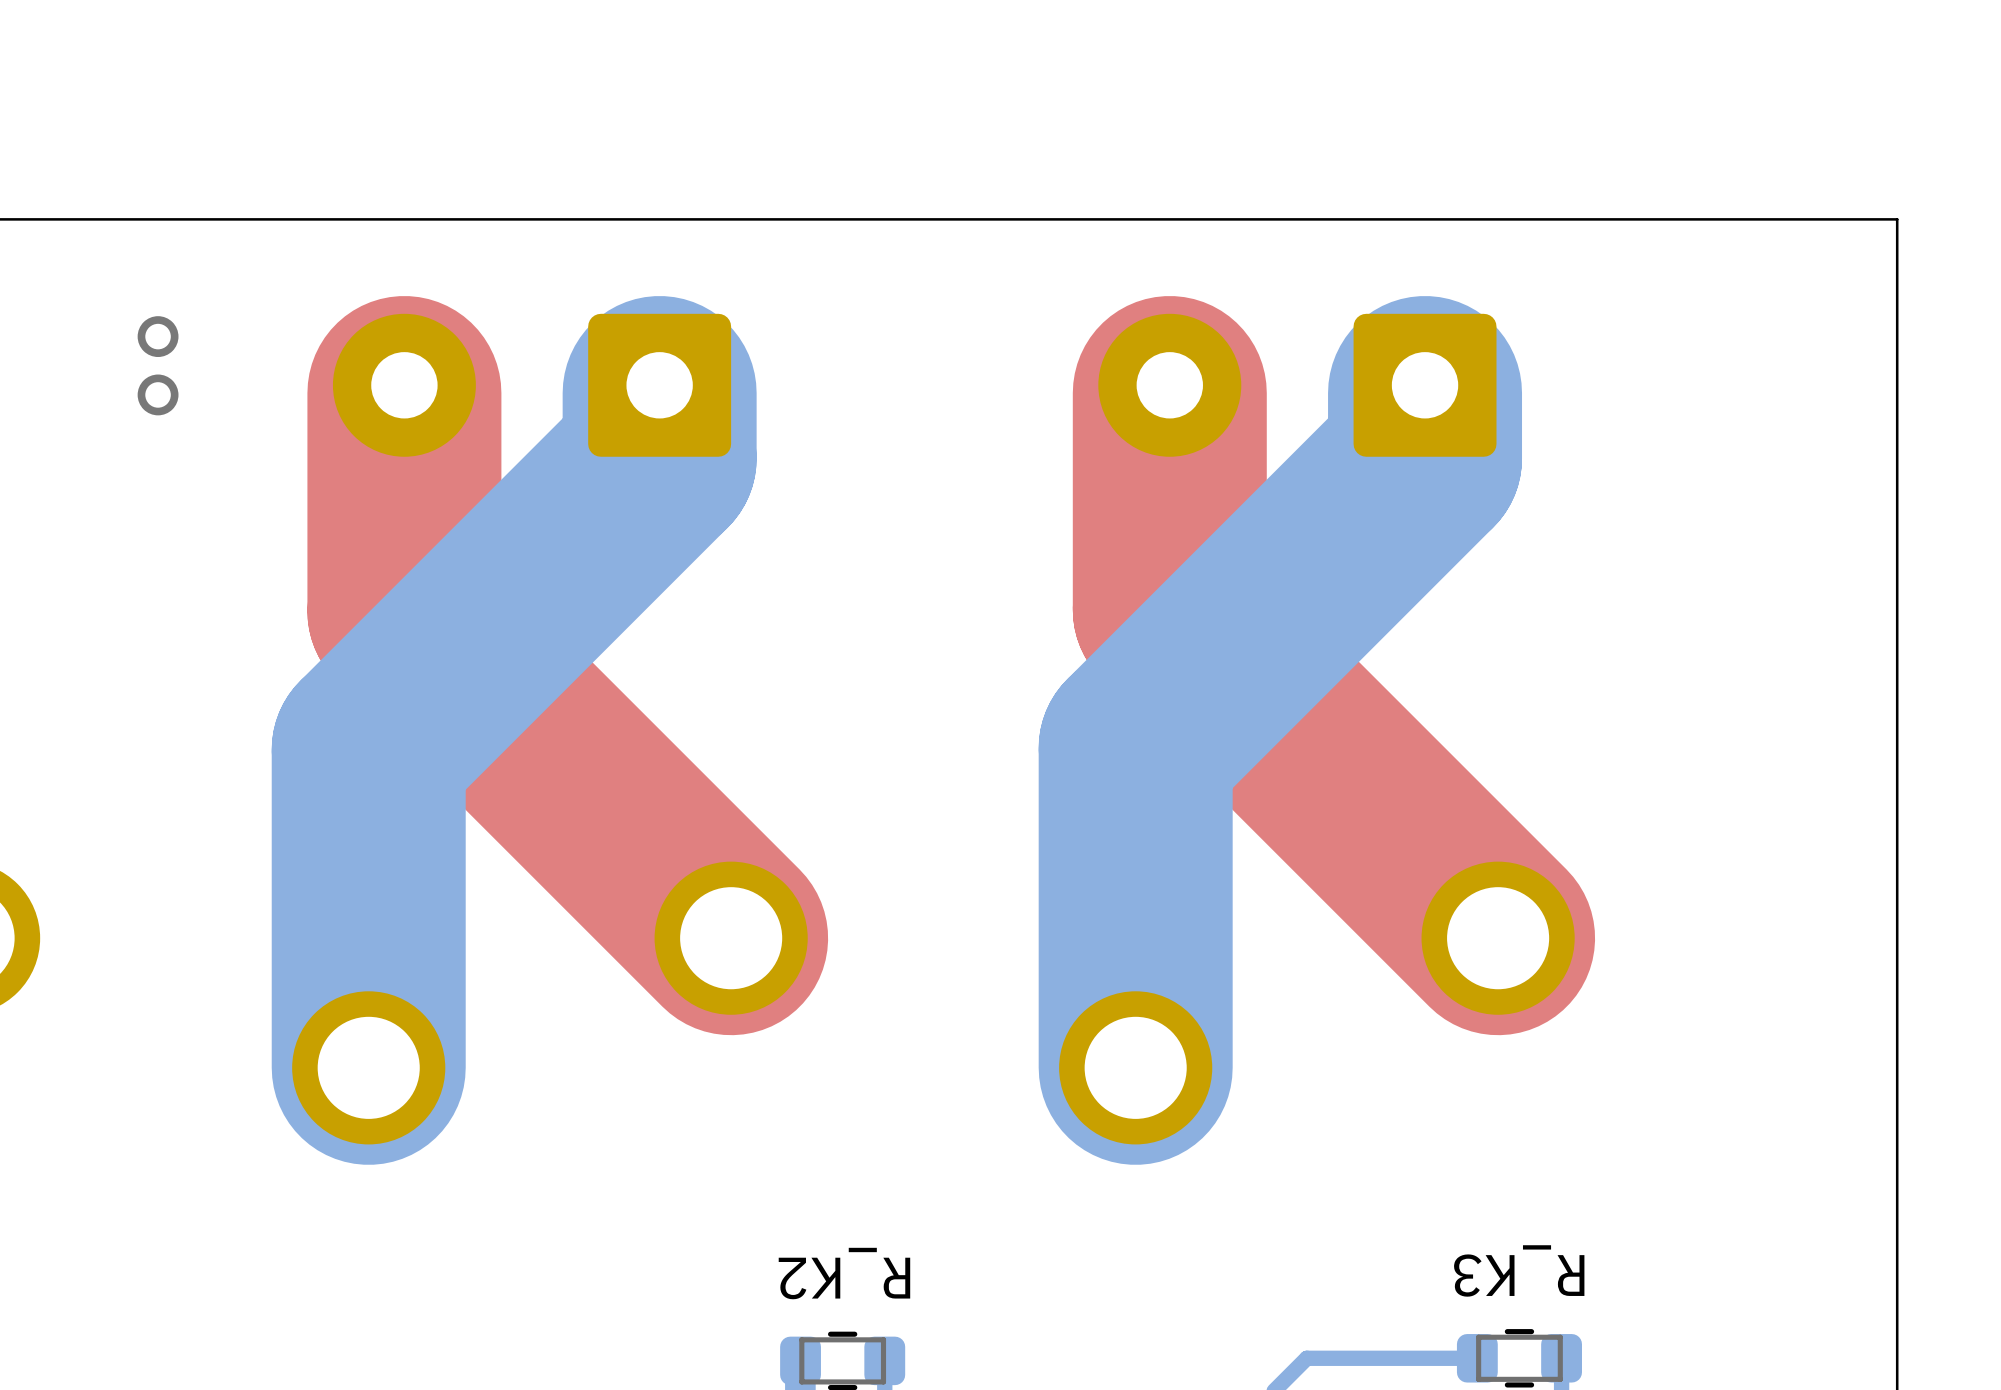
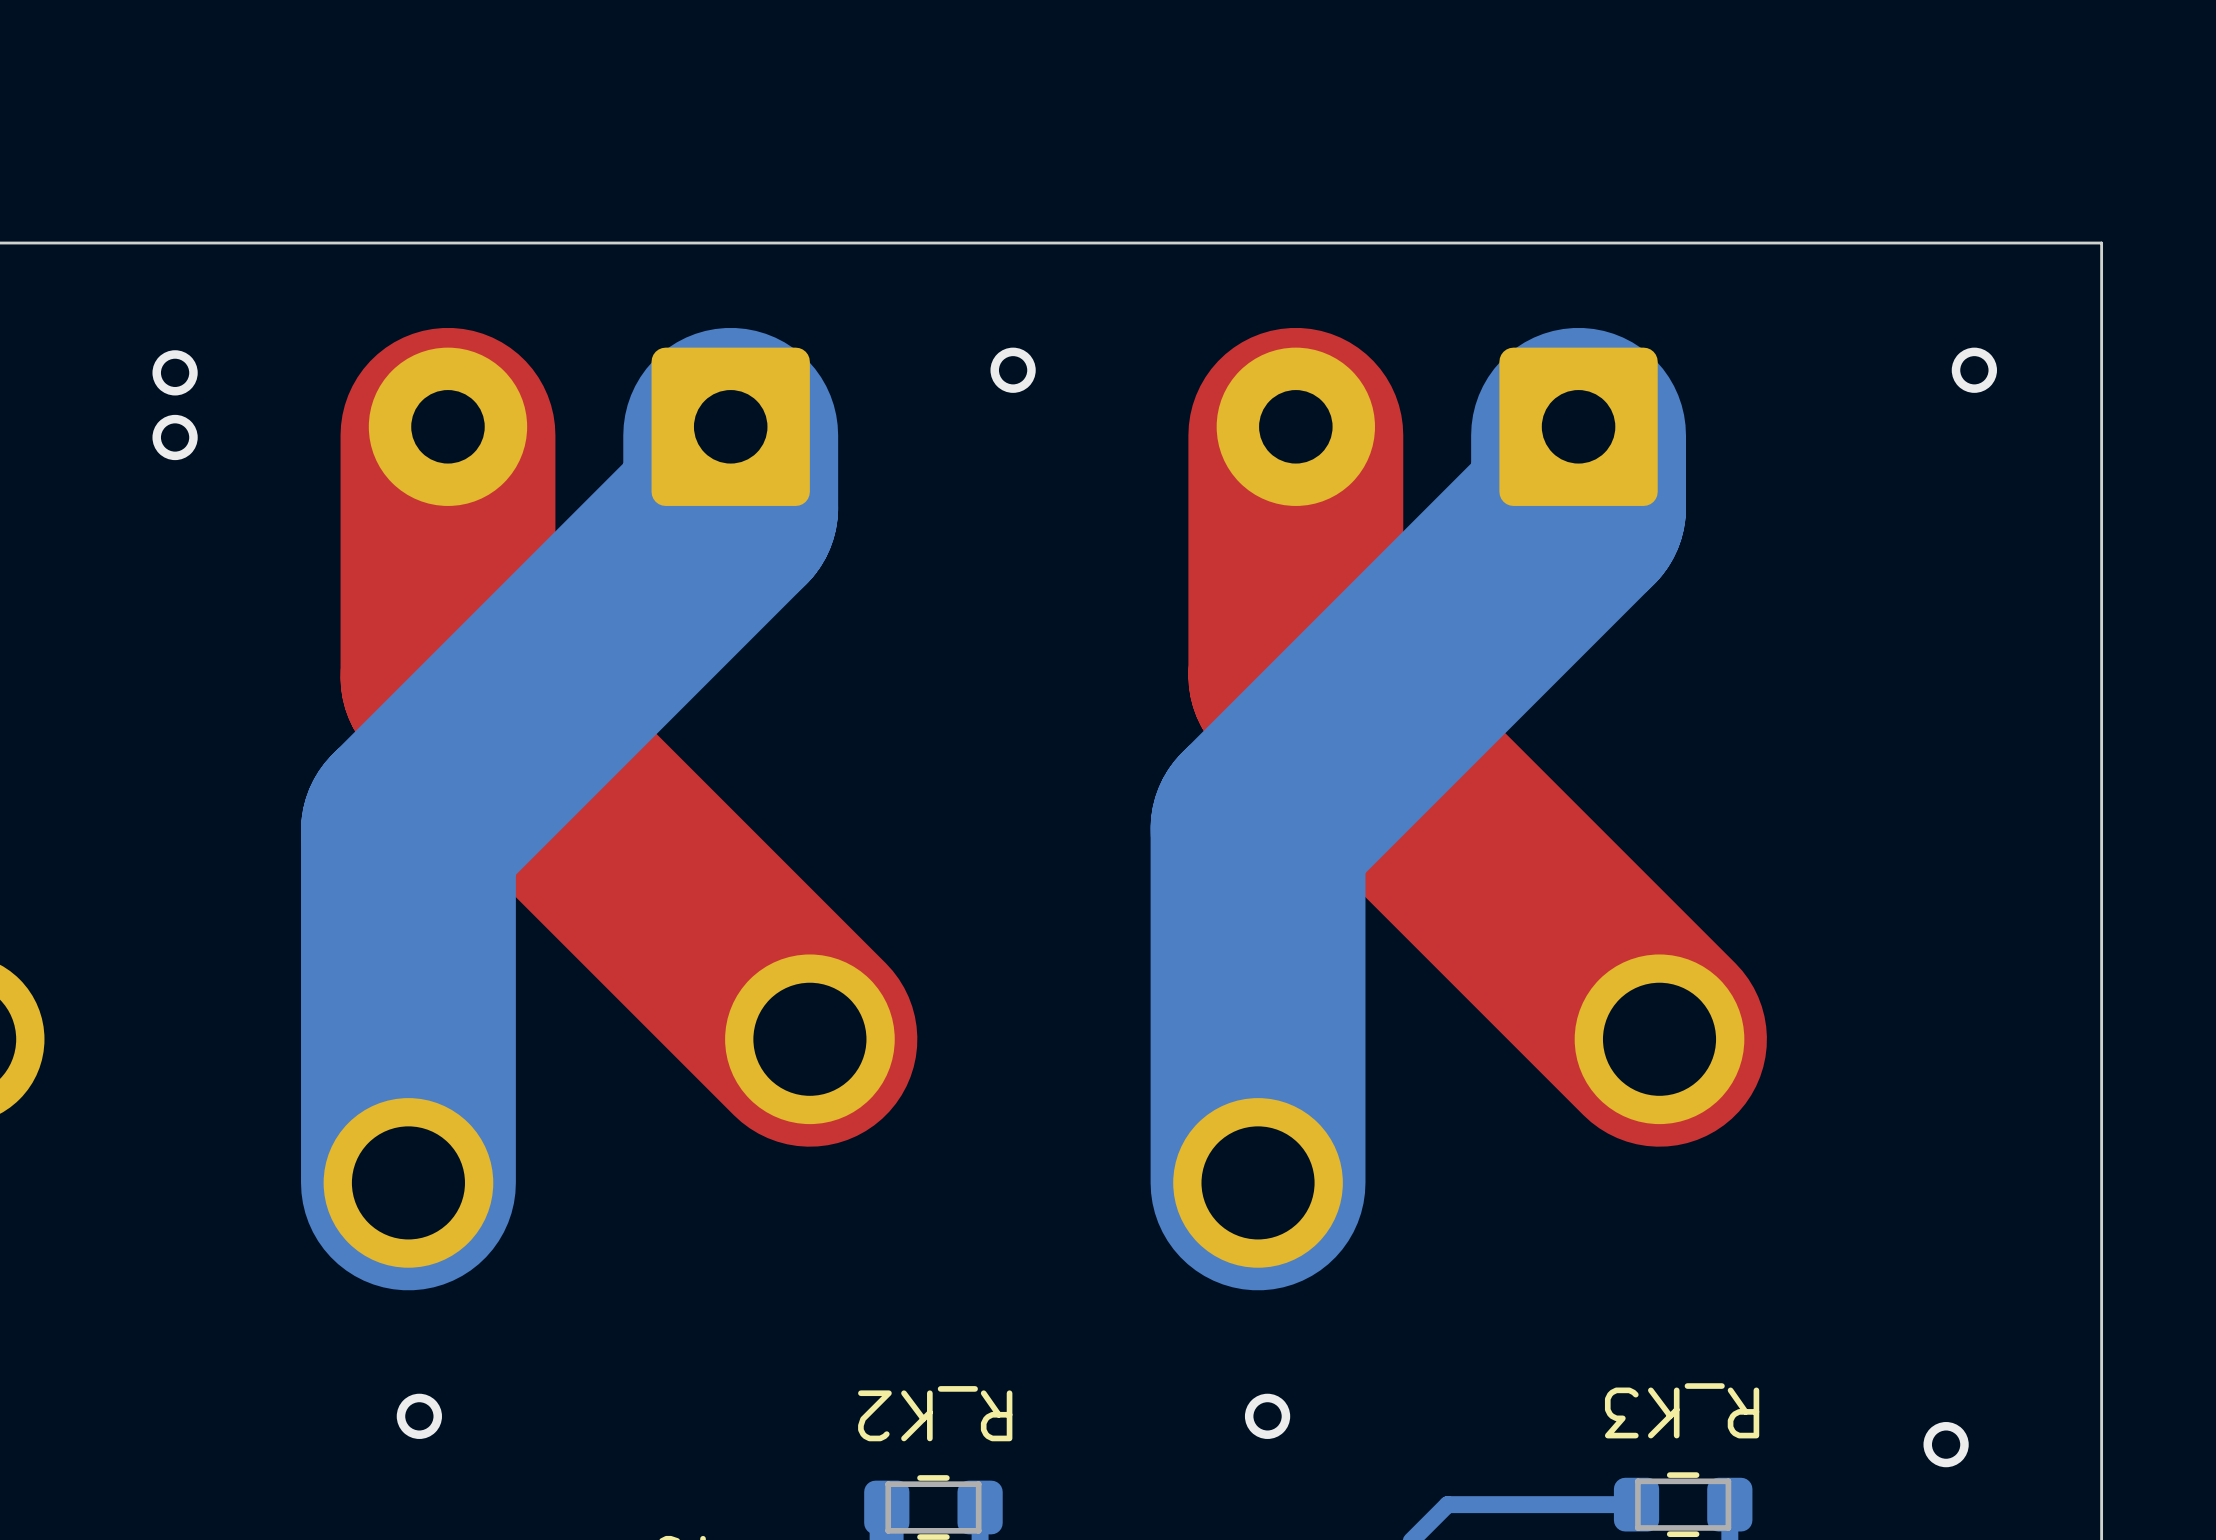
via: none -> (1013, 370)
via: none -> (1974, 370)
via: none -> (419, 1416)
via: none -> (1267, 1416)
via: none -> (1946, 1444)

